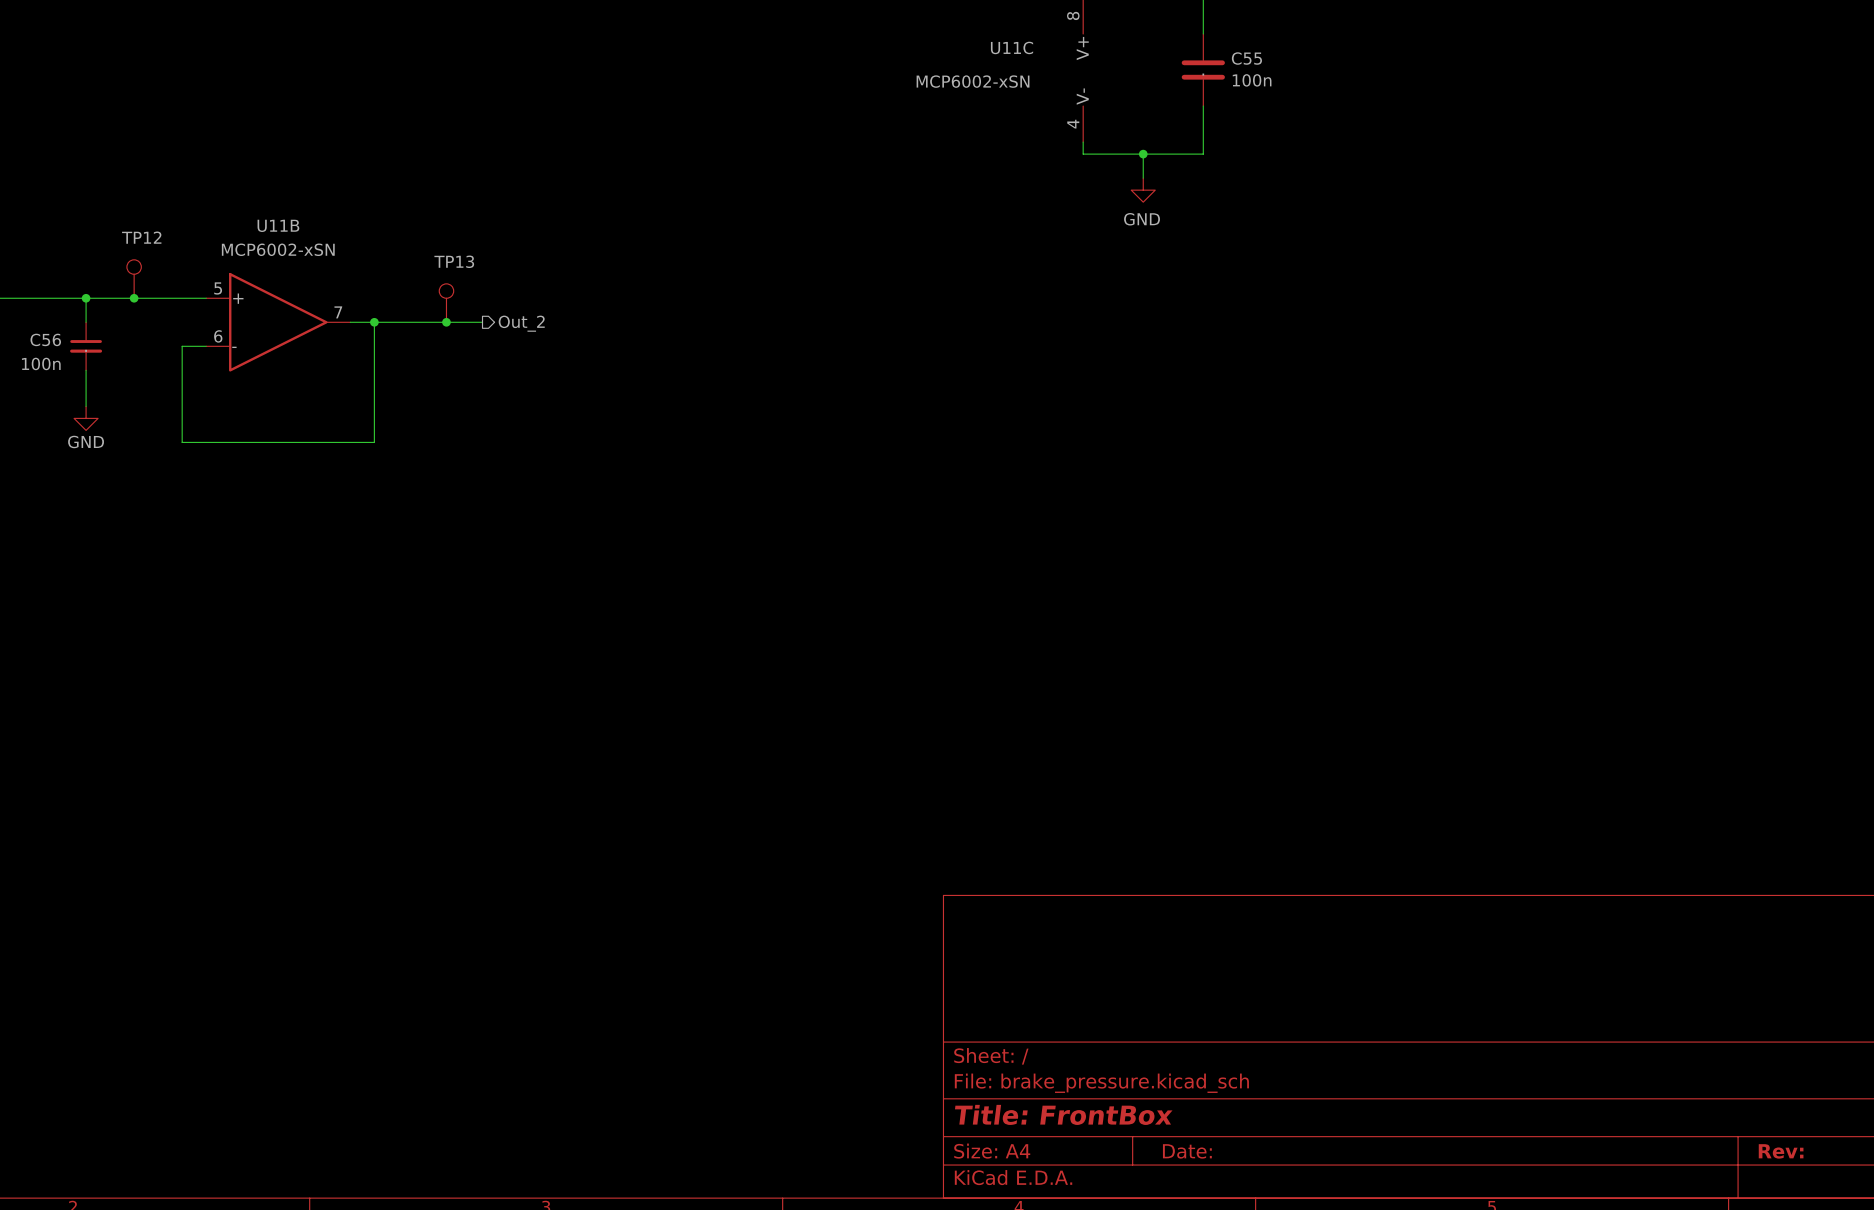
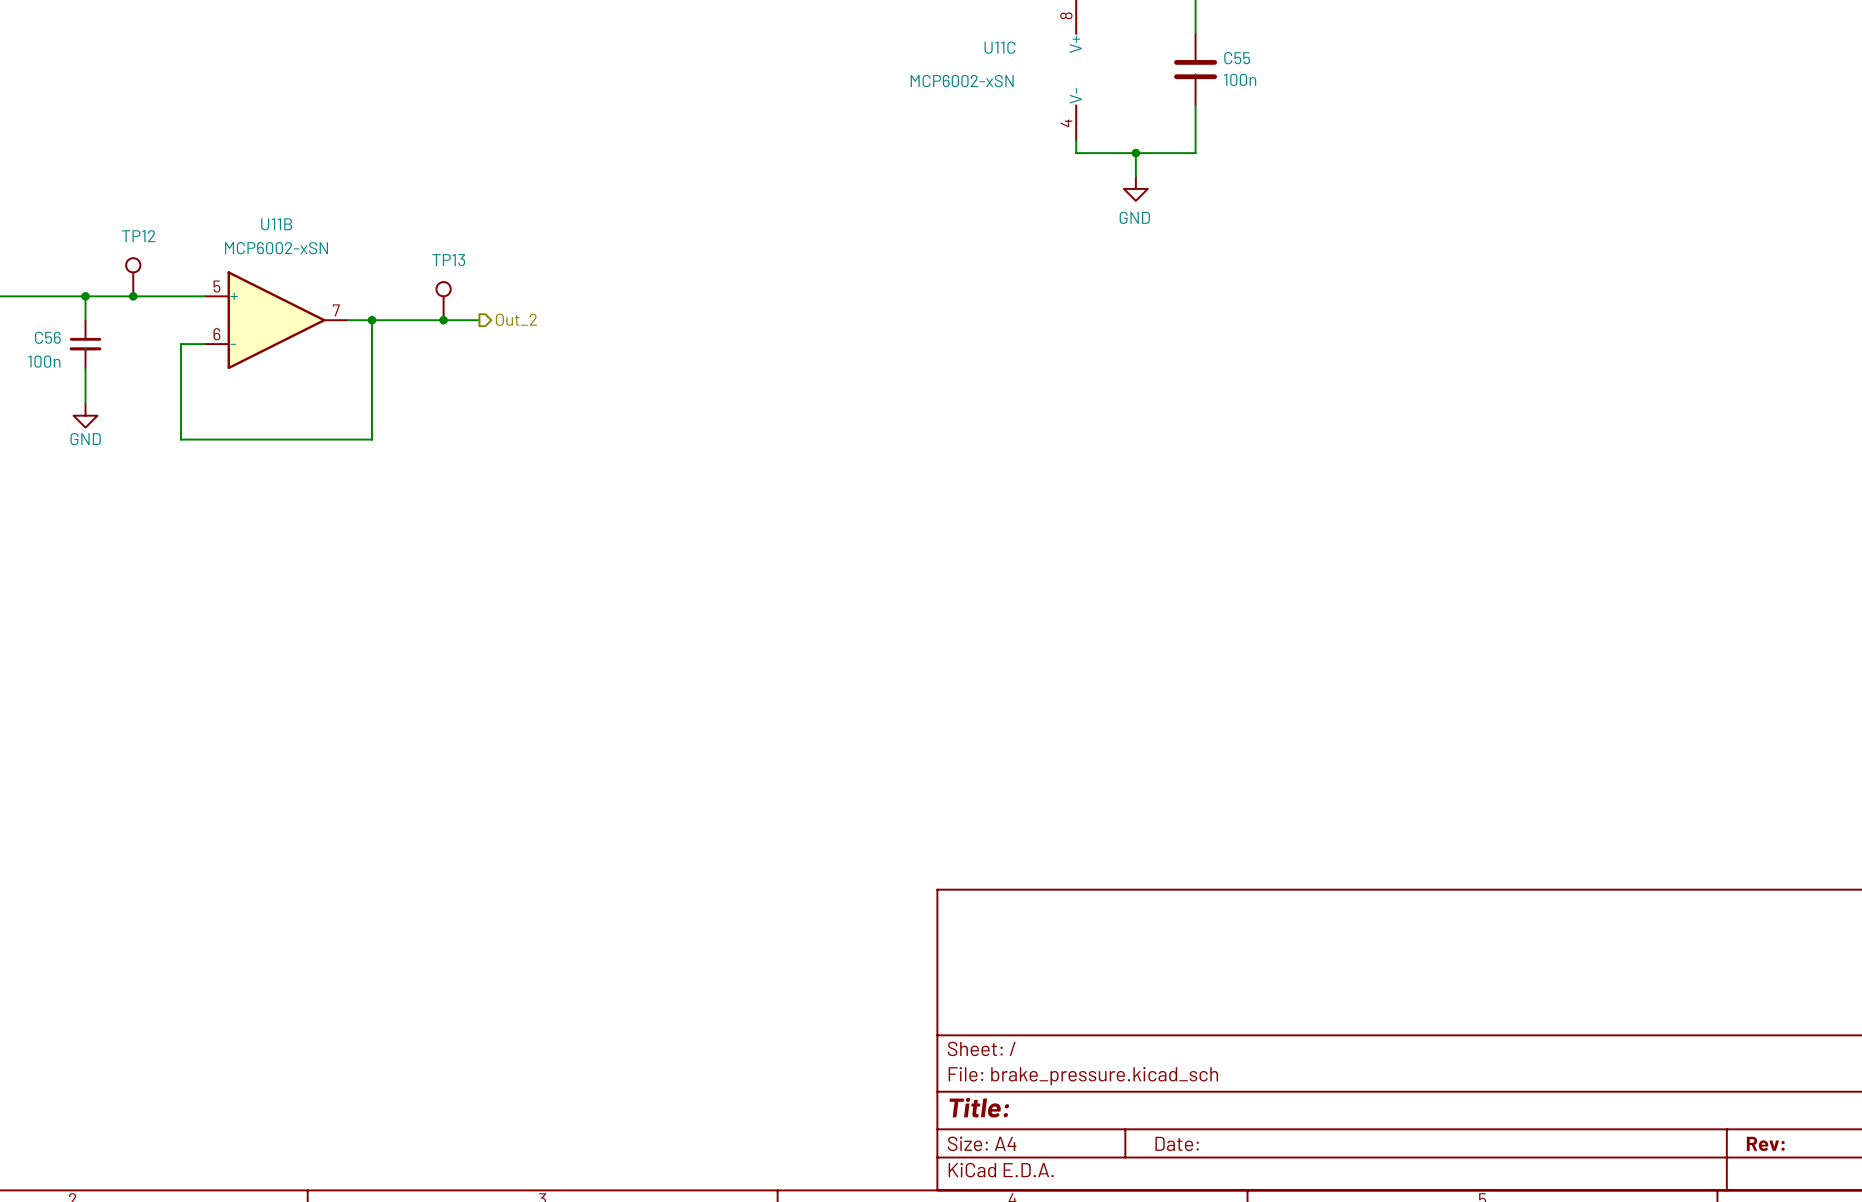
title block: Title: FrontBox (1063, 1114) -> Title: (979, 1107)

